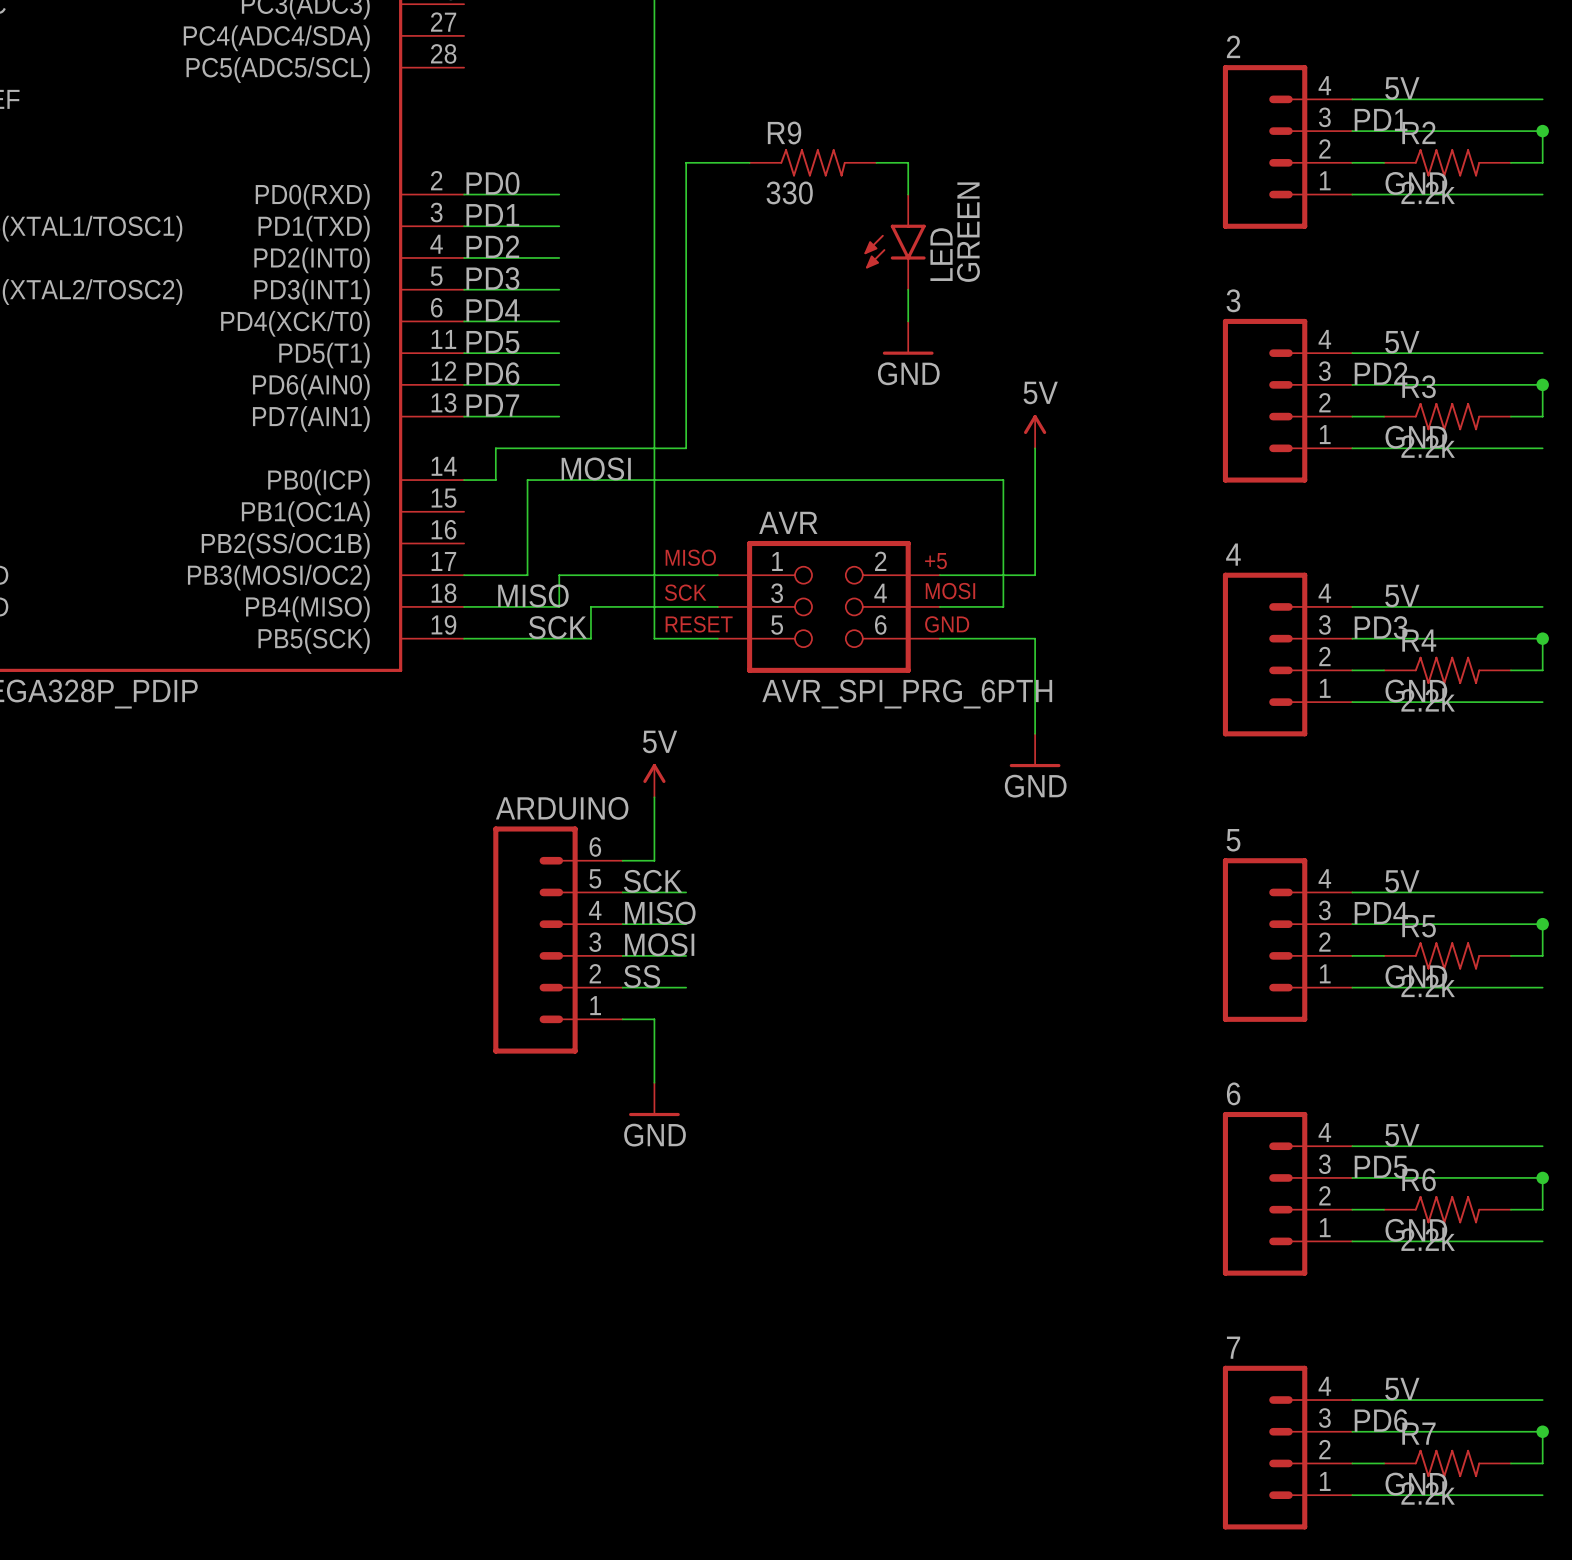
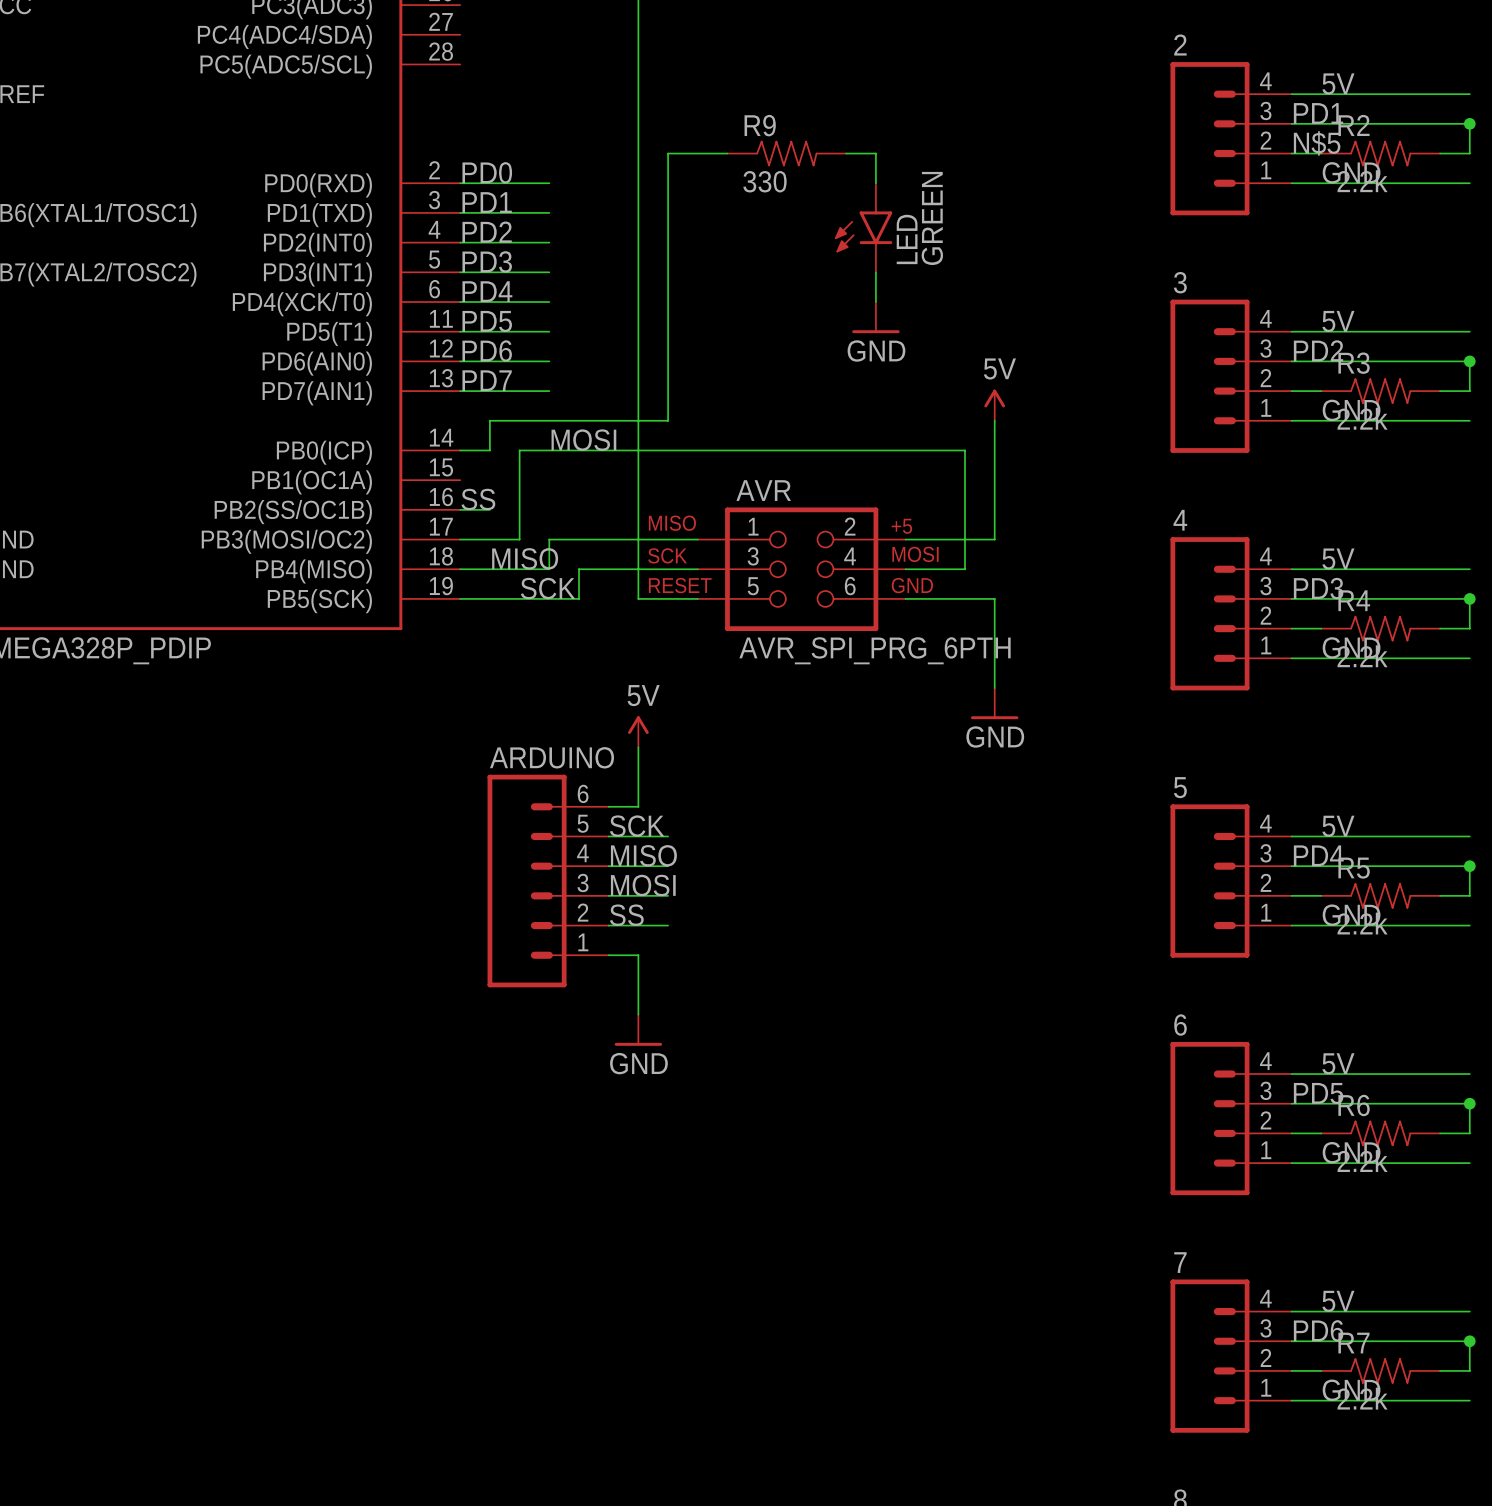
label: none -> N$5 (1317, 143)
label: none -> SS (478, 499)
wire: none -> (460, 509) (489, 509)

